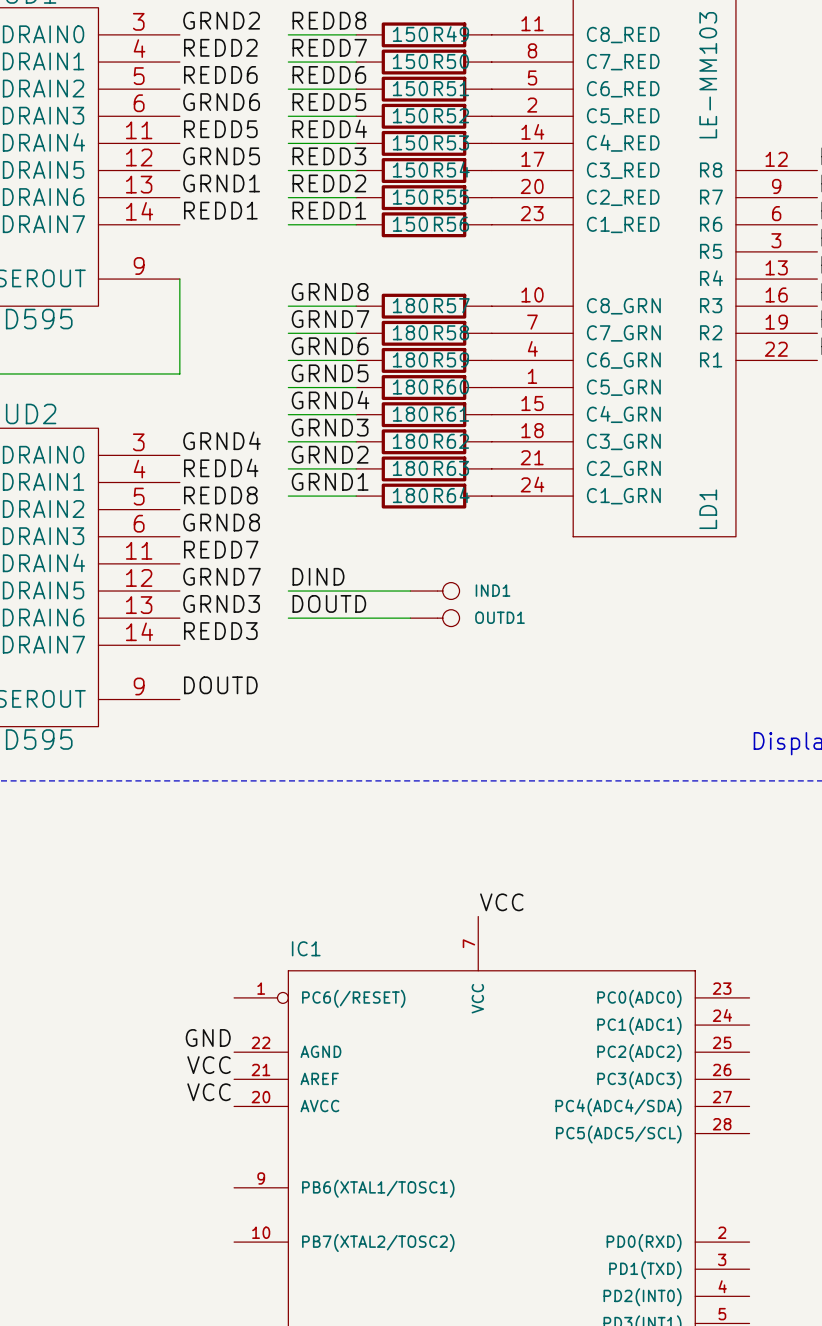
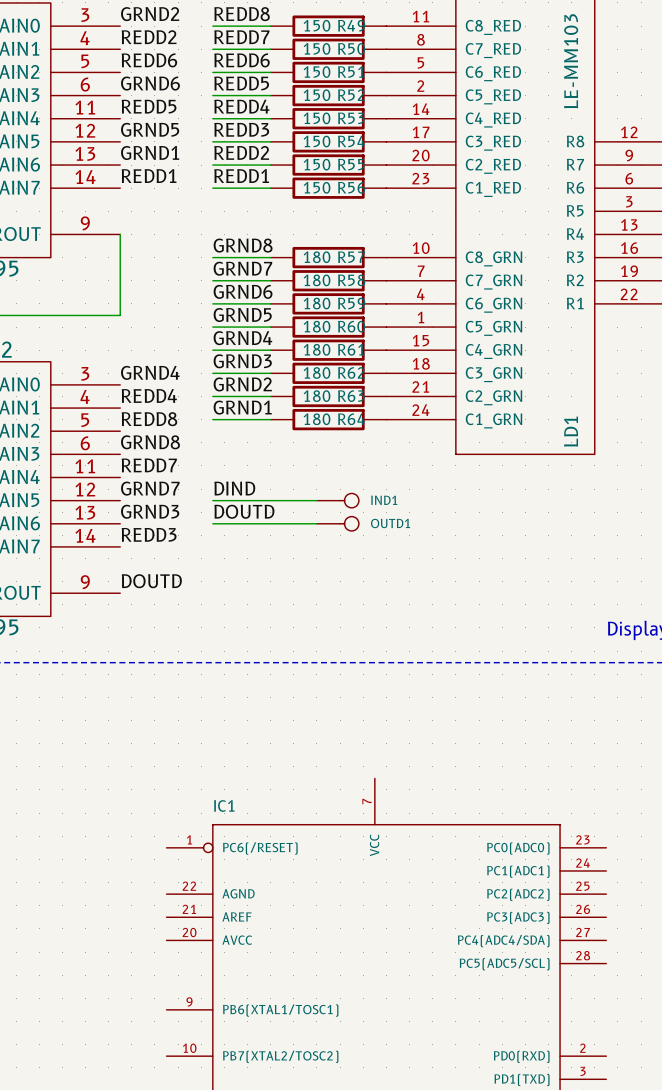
label: VCC (501, 902) -> none
label: GND (208, 1037) -> none
label: VCC (209, 1065) -> none
label: VCC (209, 1092) -> none

